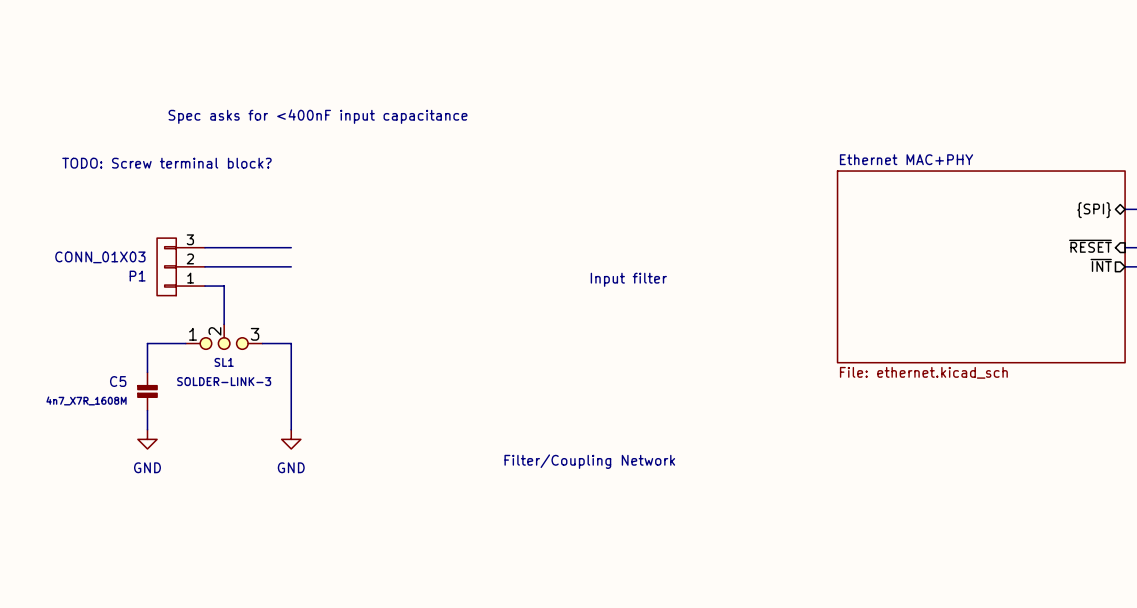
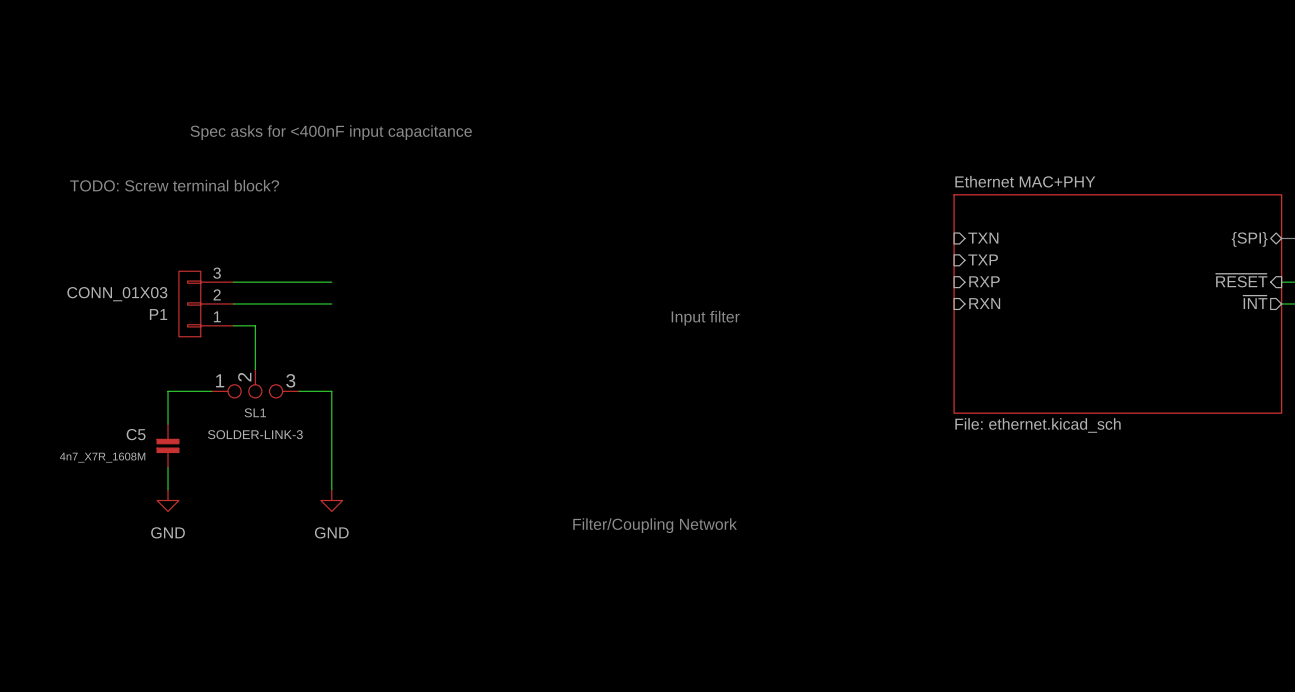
sheet pin: none -> TXN (983, 238)
sheet pin: none -> TXP (983, 259)
sheet pin: none -> RXP (984, 281)
sheet pin: none -> RXN (984, 303)

